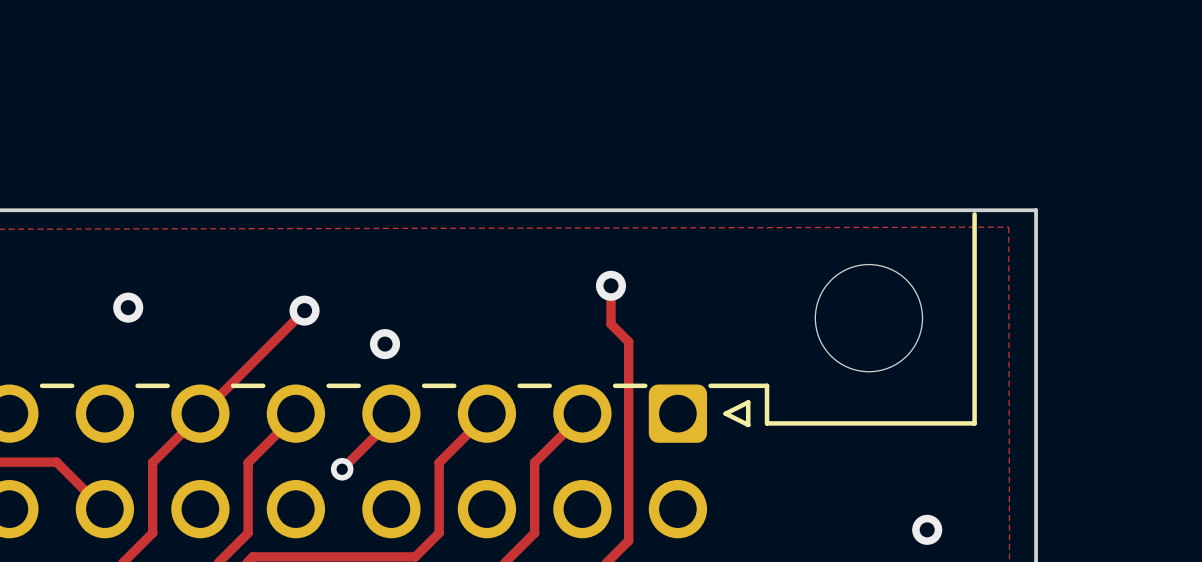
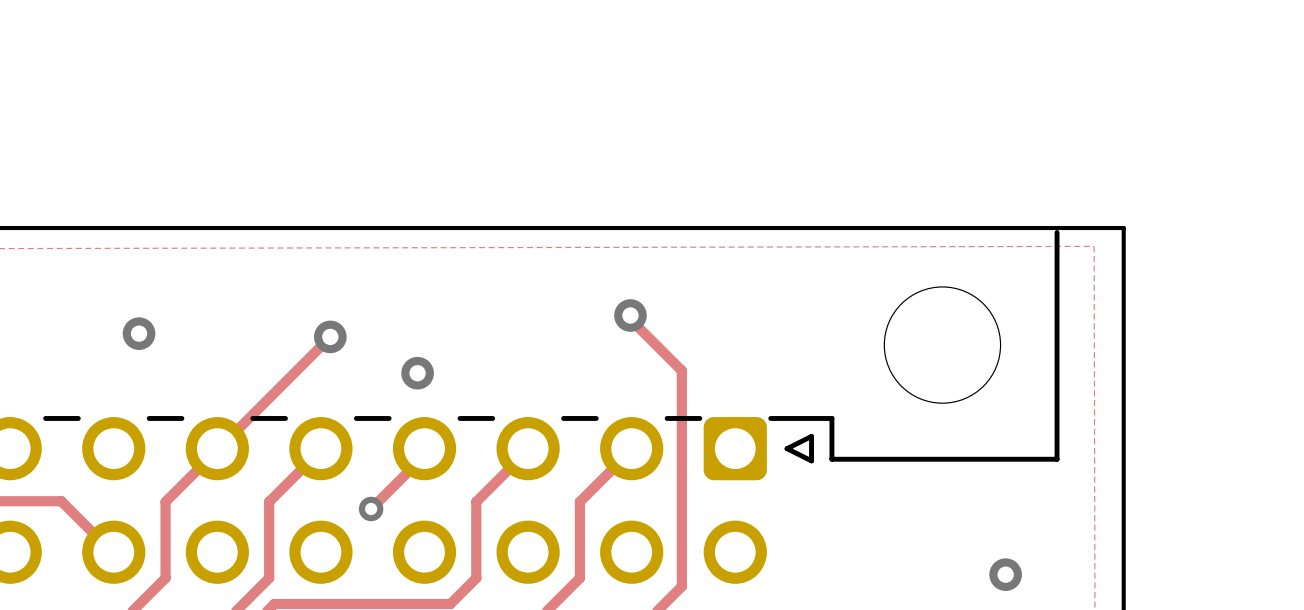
track: (610, 285) (610, 324) -> (630, 315) (630, 319) (662, 351)
via position: (610, 285) -> (630, 315)

